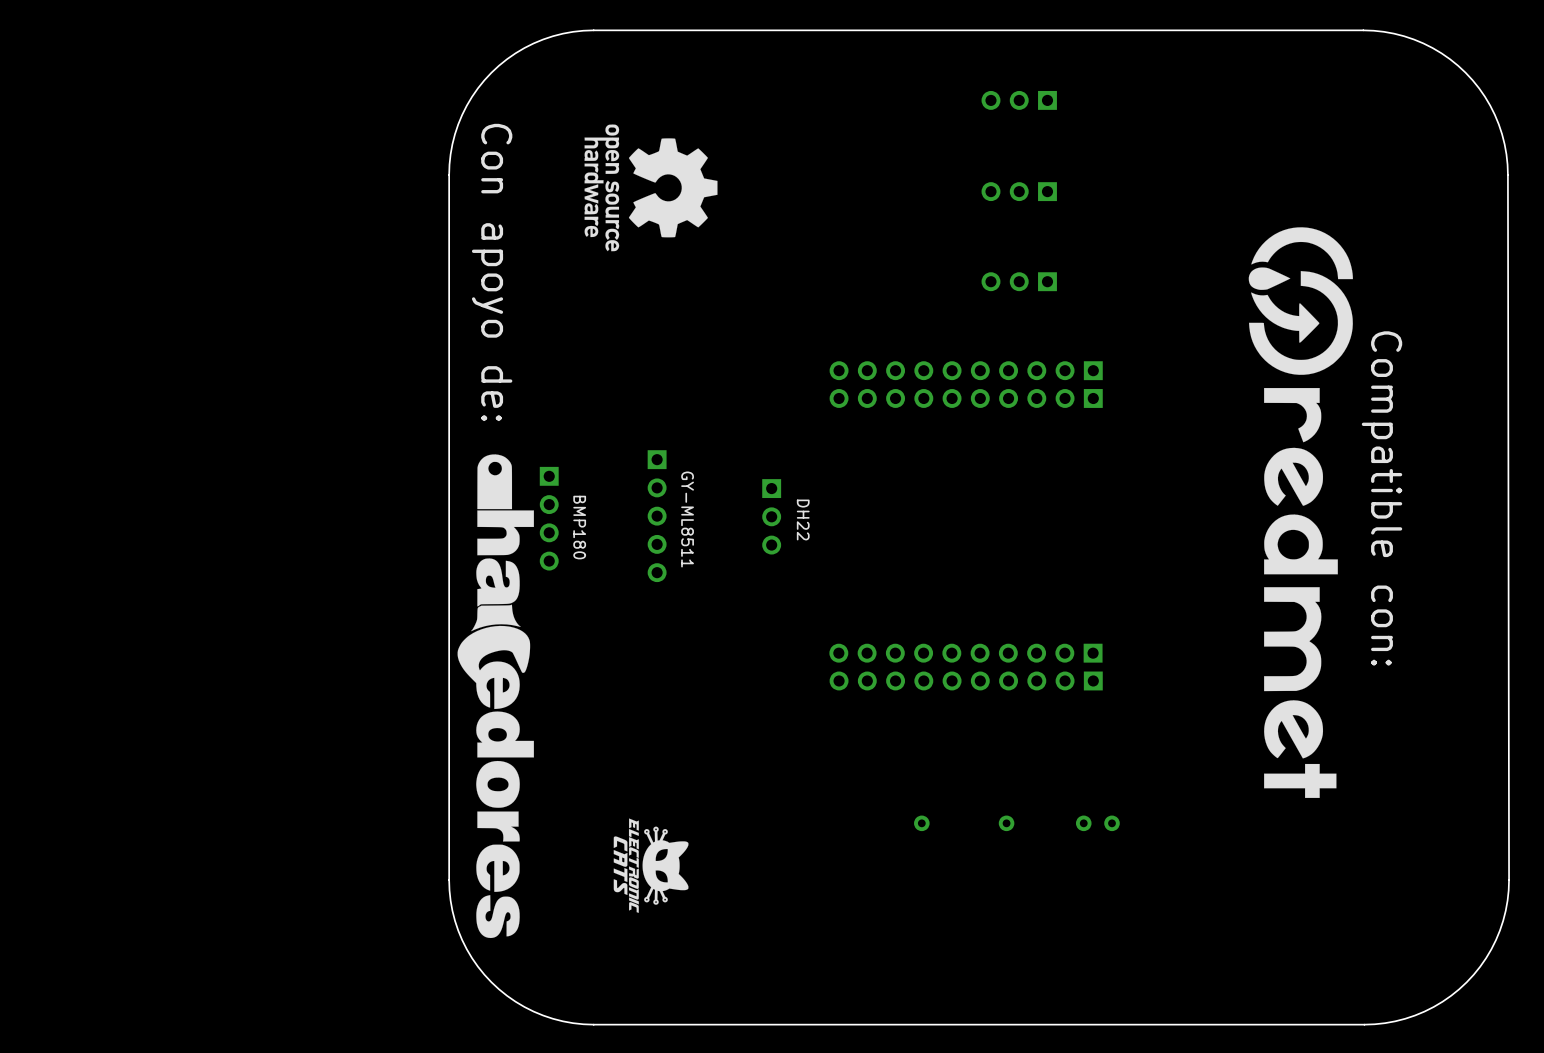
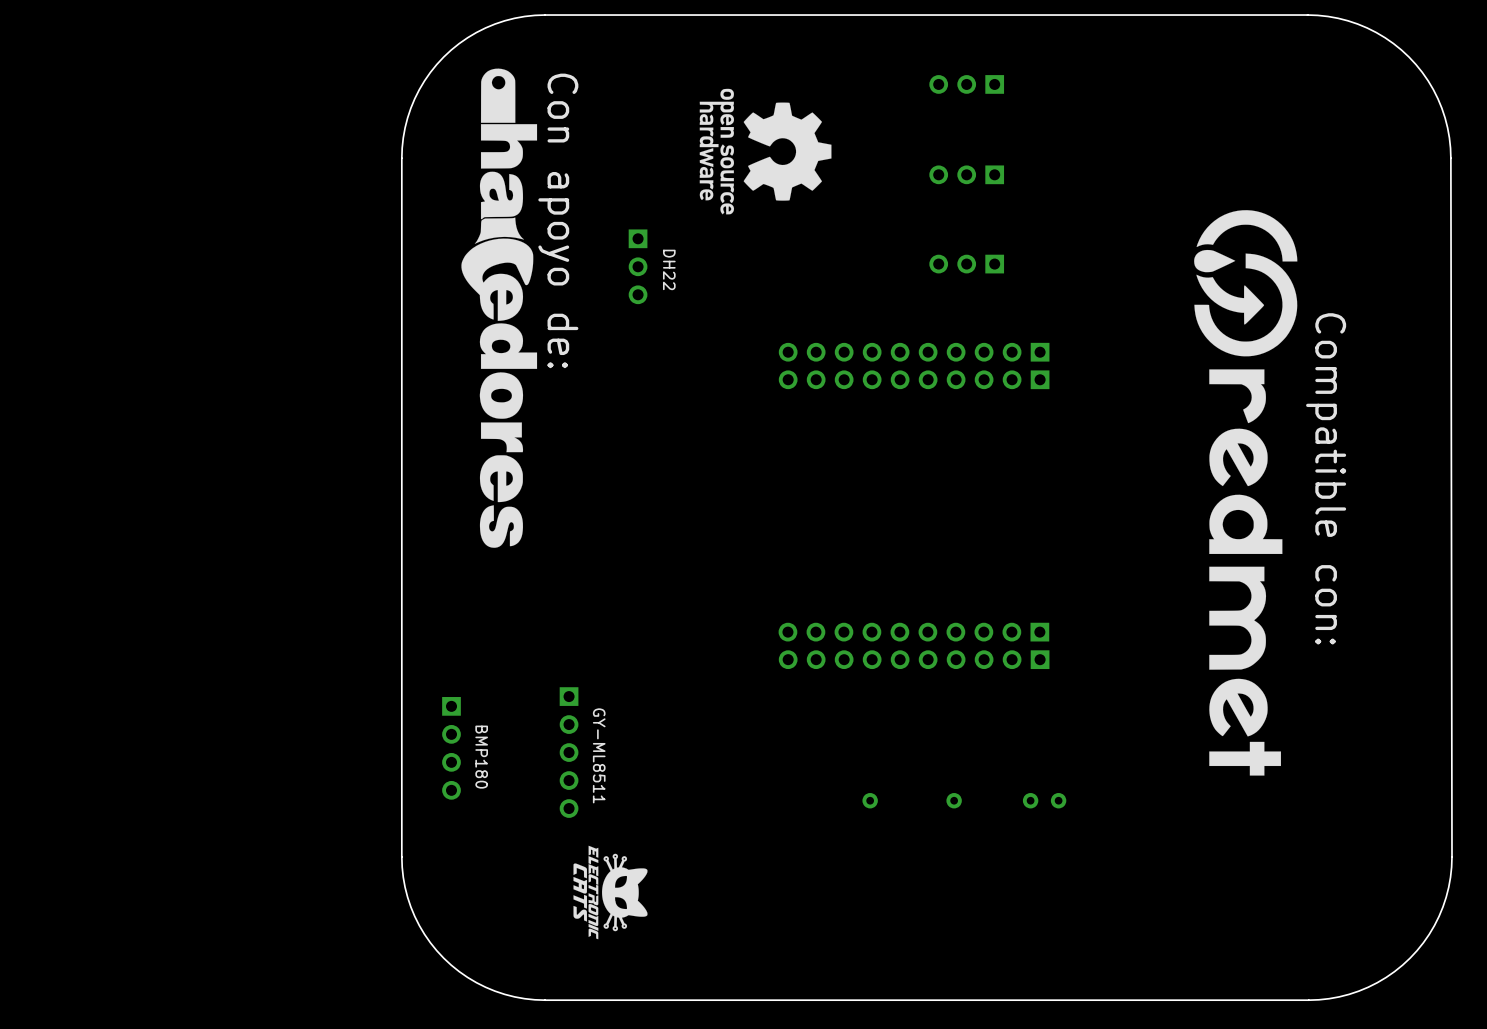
drawing: none -> [461, 68, 538, 548]
drawing position: (651, 187) -> (765, 151)
text position: Con apoyo de: (492, 272) -> Con apoyo de: (558, 220)
drawing: [457, 454, 534, 939] -> none
part position: (657, 516) -> (569, 752)
part position: (771, 516) -> (638, 266)
part position: (549, 518) -> (451, 748)
drawing position: (651, 865) -> (610, 892)

